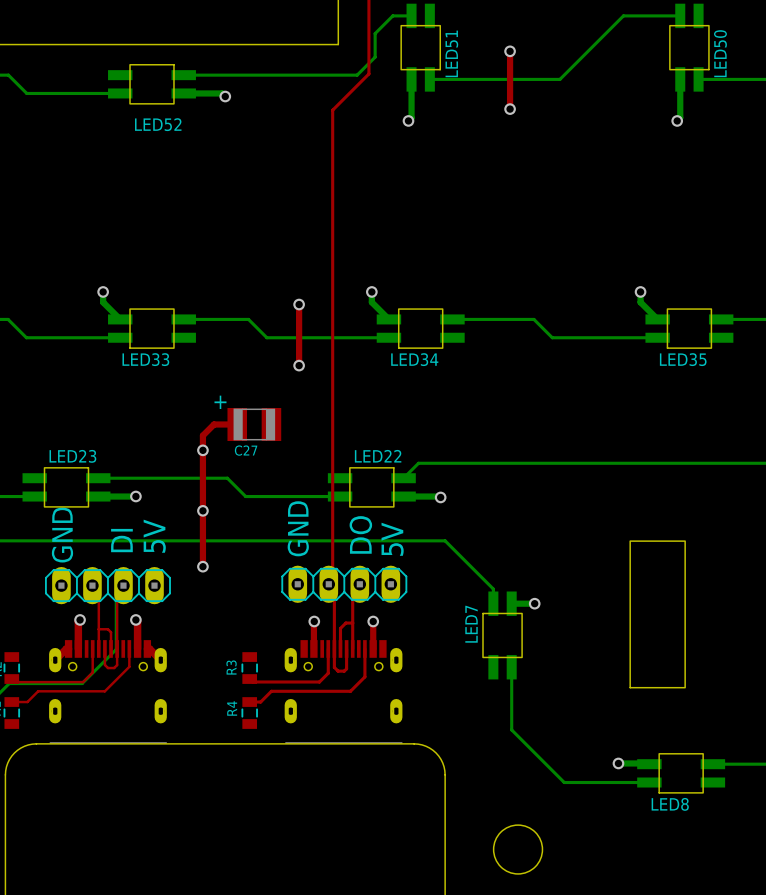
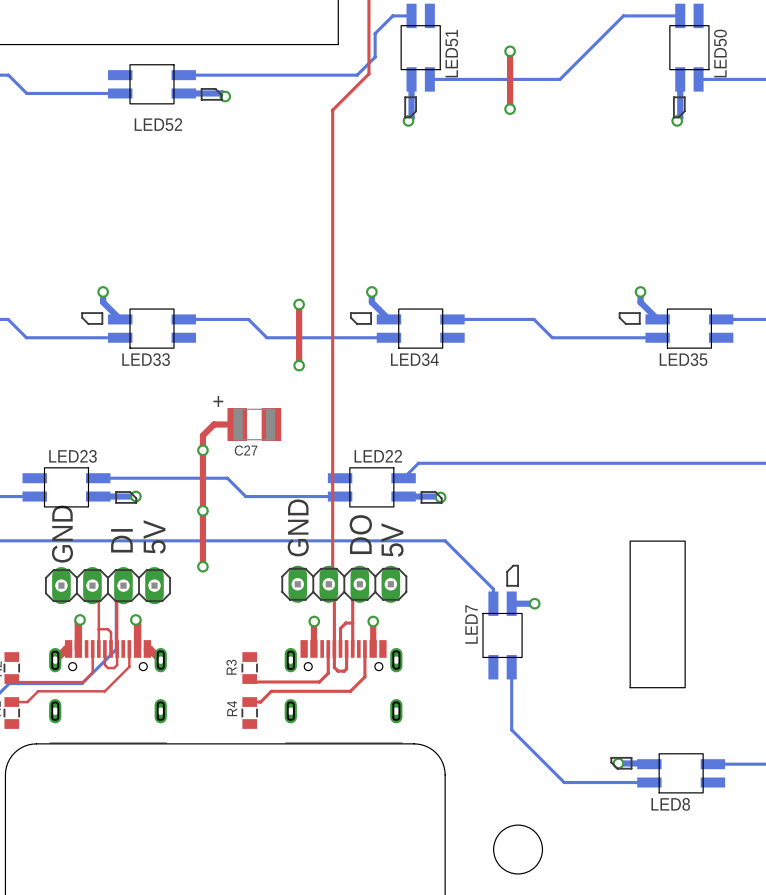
LED51 footprint: [401, 3, 441, 92] -> [401, 3, 441, 119]
LED50 footprint: [669, 3, 709, 92] -> [669, 3, 709, 119]
LED52 footprint: [108, 64, 196, 104] -> [108, 64, 223, 104]
LED33 footprint: [108, 309, 196, 349] -> [81, 309, 196, 349]
LED34 footprint: [376, 309, 465, 349] -> [349, 309, 465, 349]
LED35 footprint: [645, 309, 734, 349] -> [618, 309, 734, 349]
LED23 footprint: [22, 467, 111, 507] -> [22, 467, 138, 507]
LED22 footprint: [327, 467, 416, 507] -> [327, 467, 443, 507]
LED7 footprint: [482, 591, 523, 680] -> [482, 564, 523, 680]
LED8 footprint: [637, 753, 726, 793] -> [610, 753, 726, 793]

